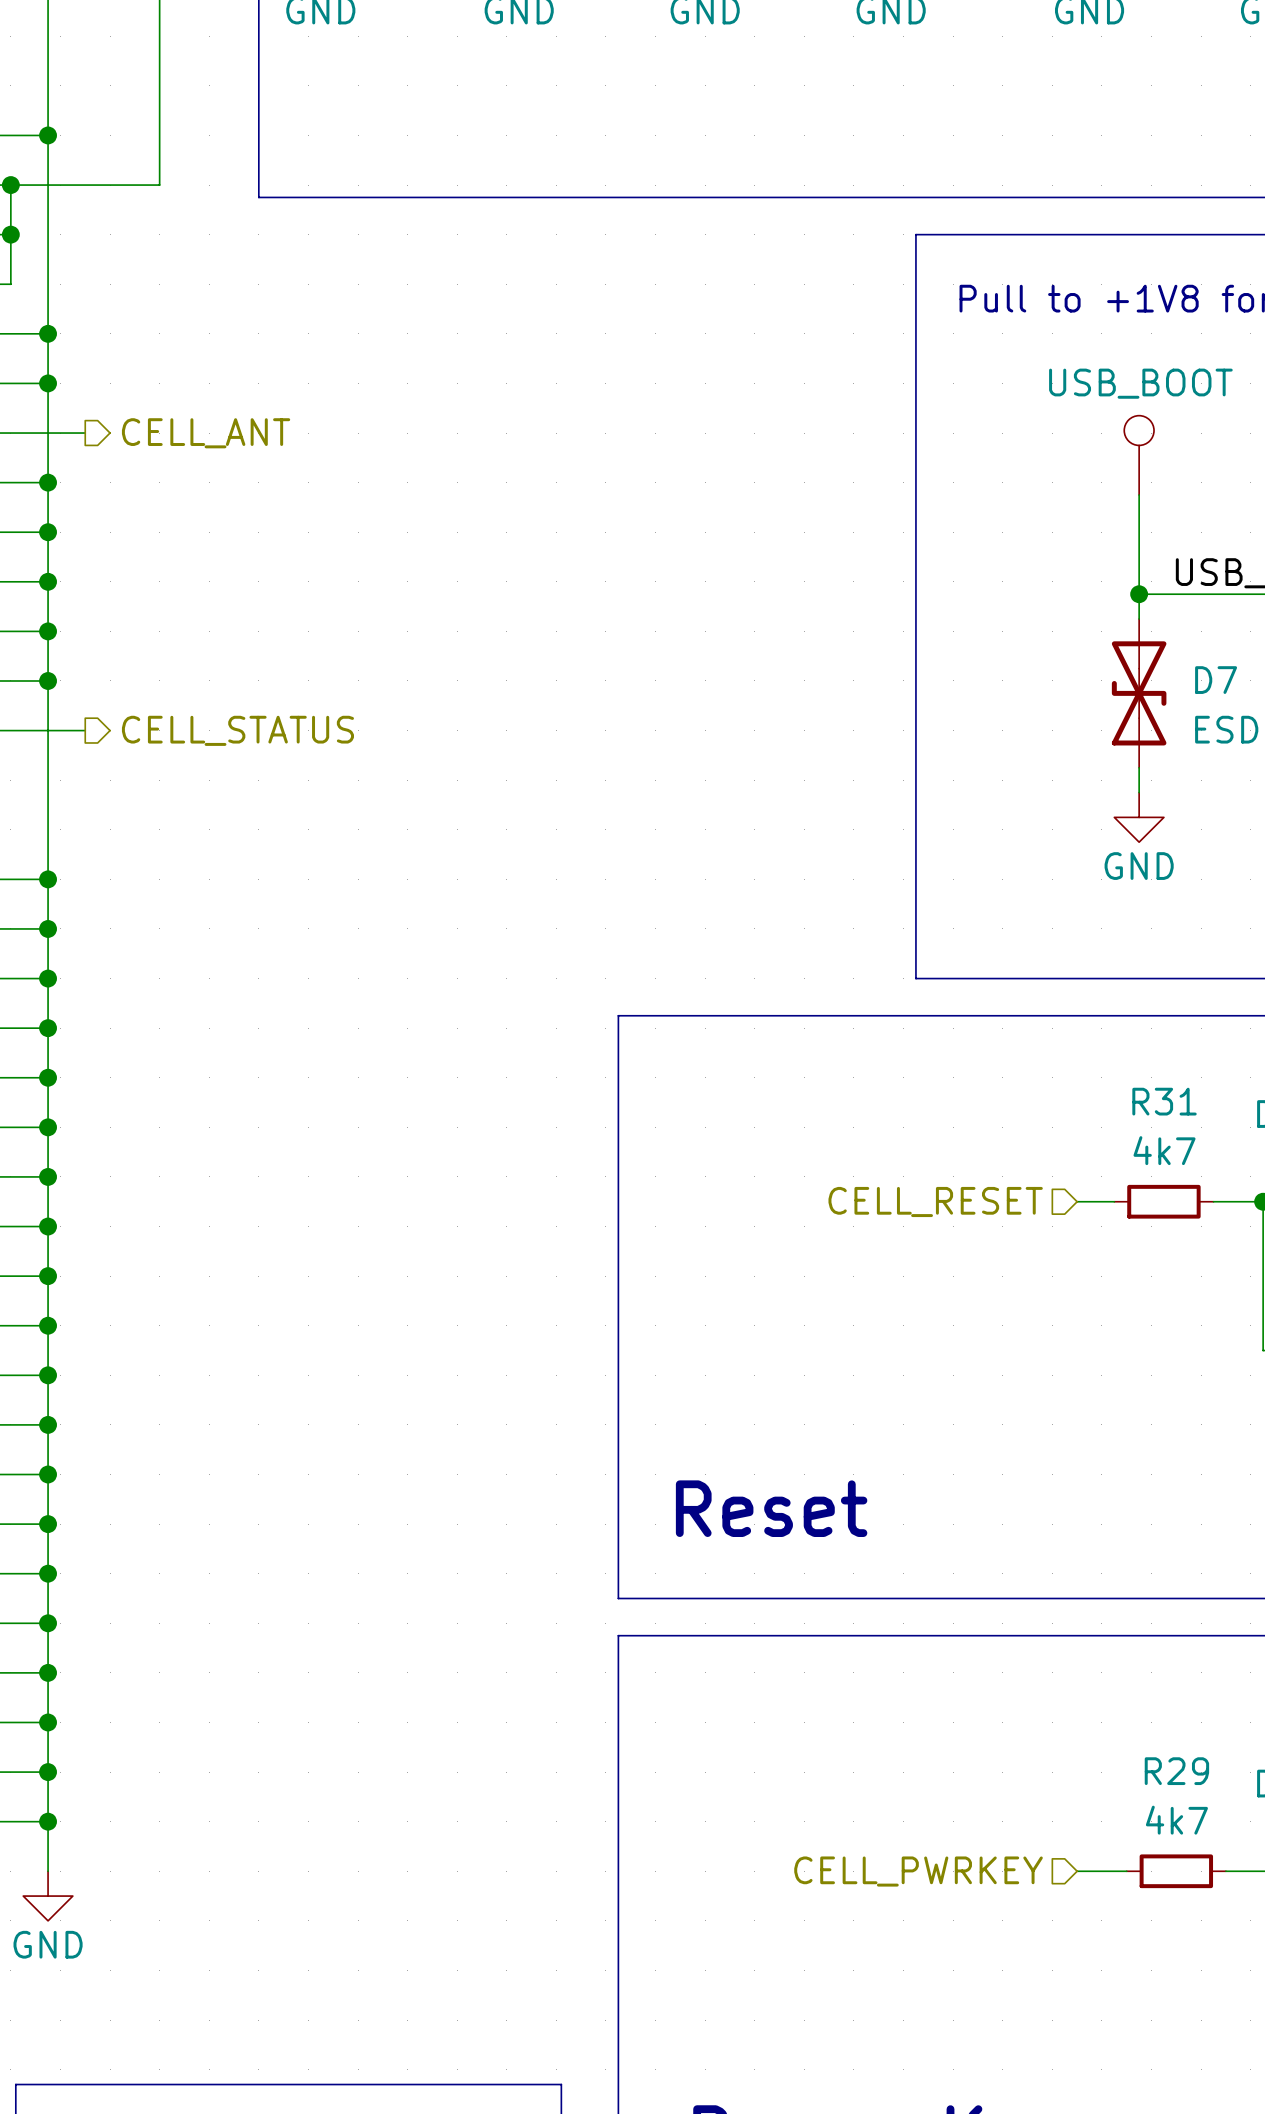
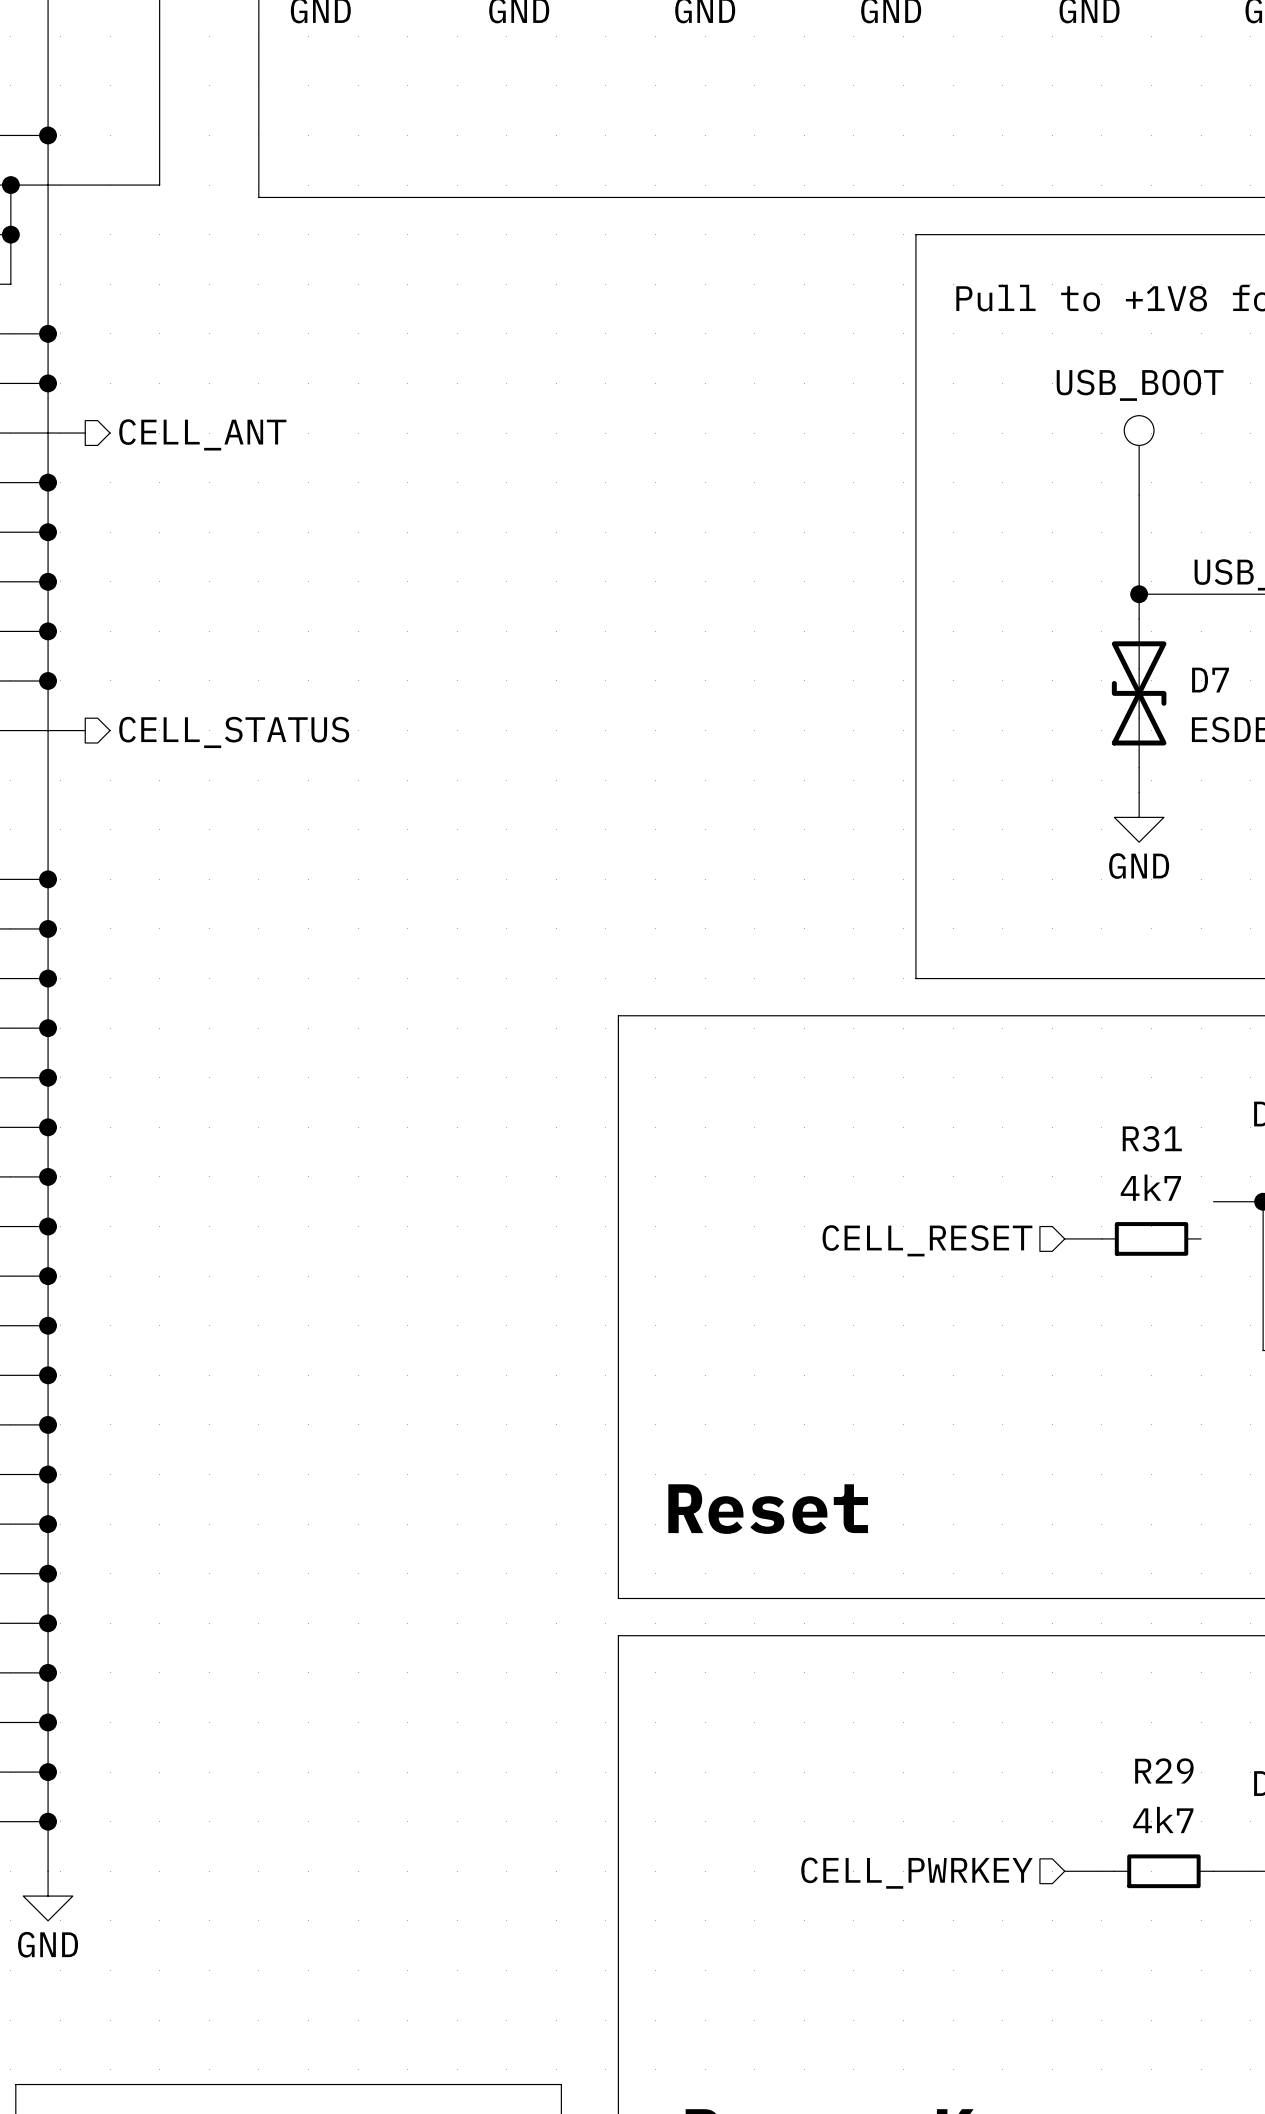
hierarchical label position: CELL_RESET (935, 1201) -> CELL_RESET (927, 1240)
wire: (1077, 1201) (1114, 1201) -> (1064, 1238) (1101, 1238)
R31 position: (1163, 1201) -> (1151, 1238)
hierarchical label position: CELL_PWRKEY (918, 1871) -> CELL_PWRKEY (916, 1873)
wire: none -> (1064, 1871) (1077, 1871)
R29 position: (1176, 1871) -> (1163, 1871)

